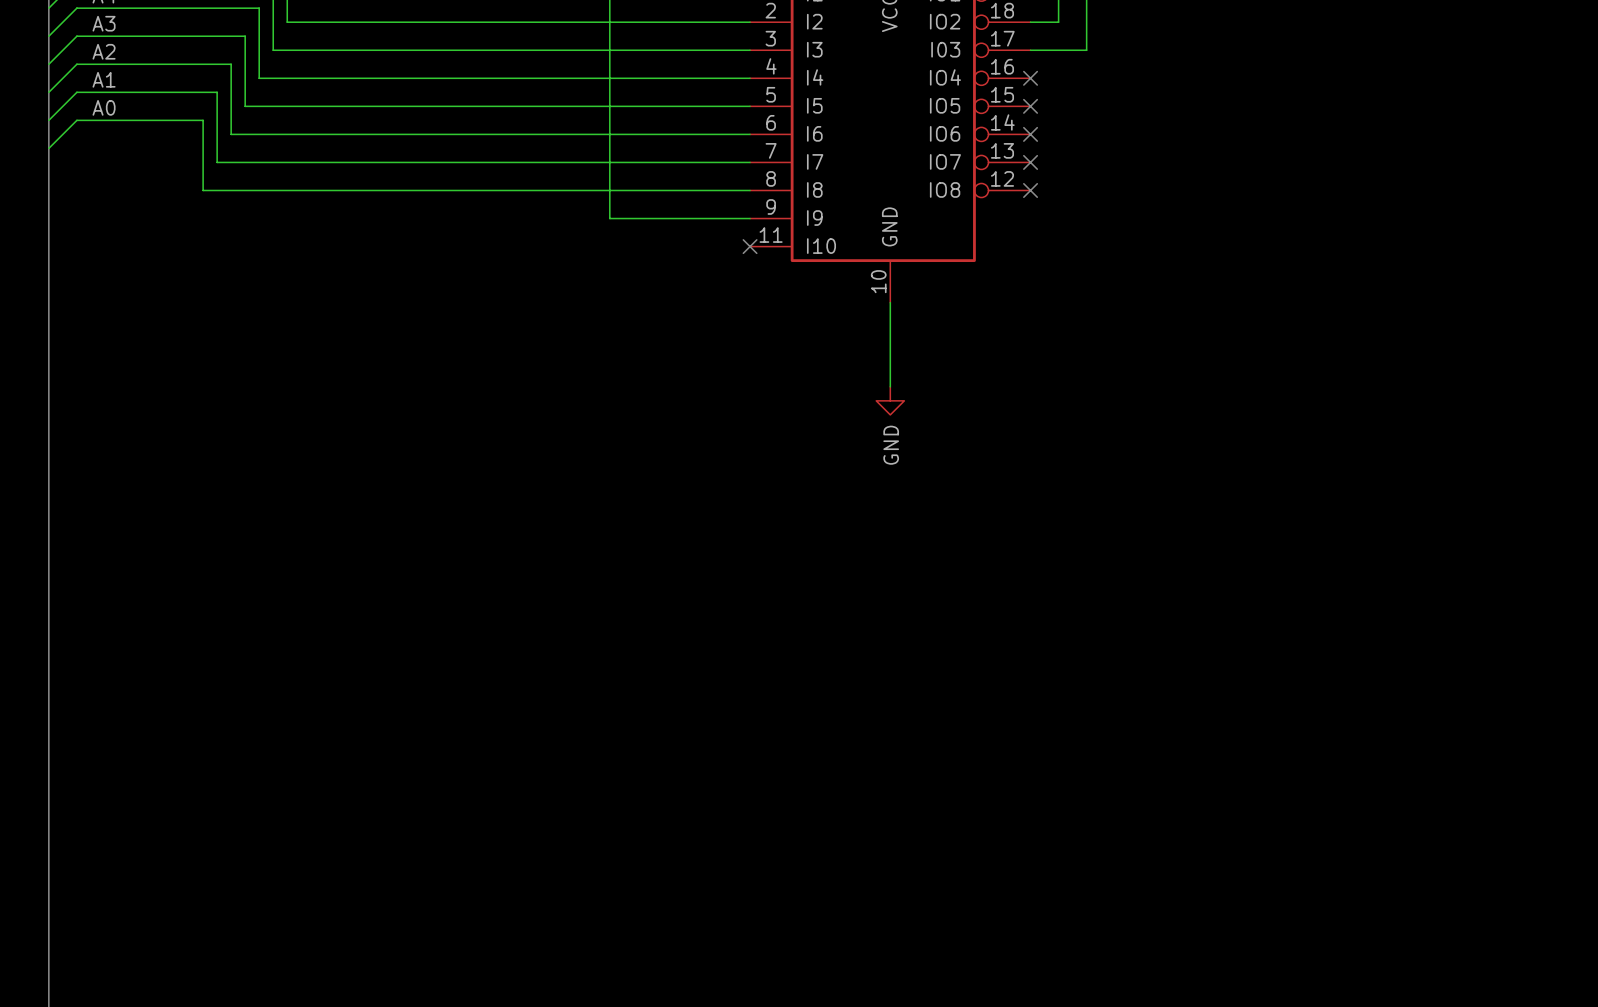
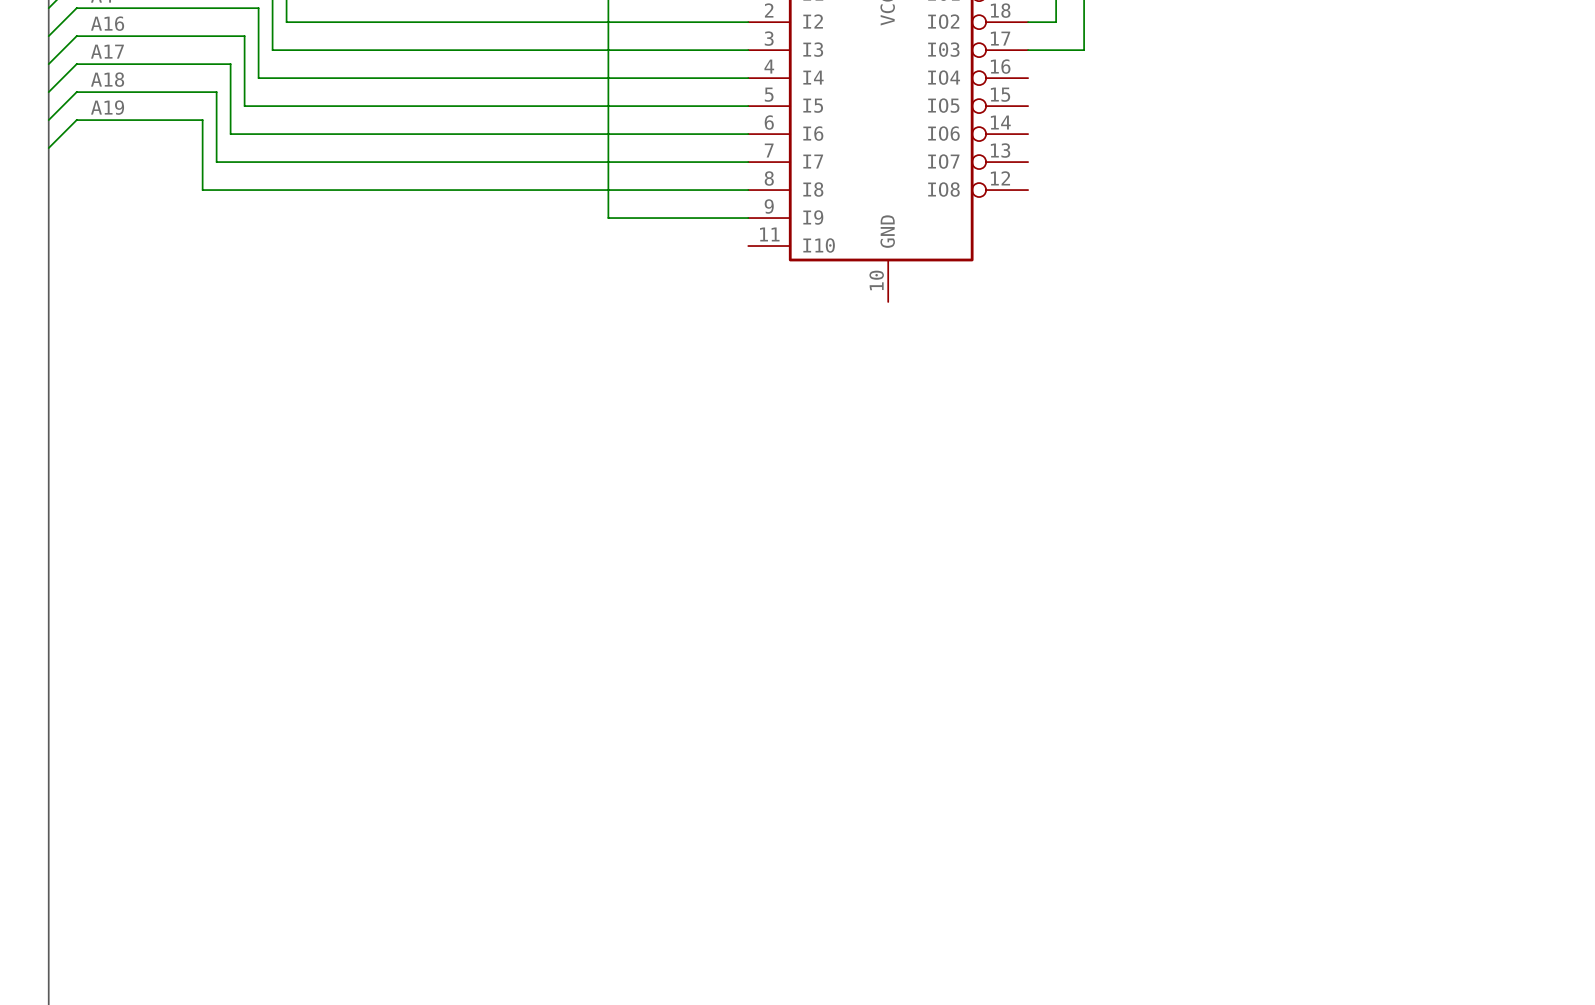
label: A3 (104, 23) -> A16 (107, 23)
label: A2 (104, 51) -> A17 (107, 51)
no-connect mark: (1030, 78) -> none
label: A1 (104, 79) -> A18 (107, 79)
no-connect mark: (1030, 106) -> none
label: A0 (104, 107) -> A19 (107, 107)
no-connect mark: (1030, 134) -> none
no-connect mark: (1030, 162) -> none
no-connect mark: (1030, 190) -> none
no-connect mark: (750, 246) -> none
wire: (890, 302) (890, 386) -> none
power symbol: GND (890, 400) -> none

